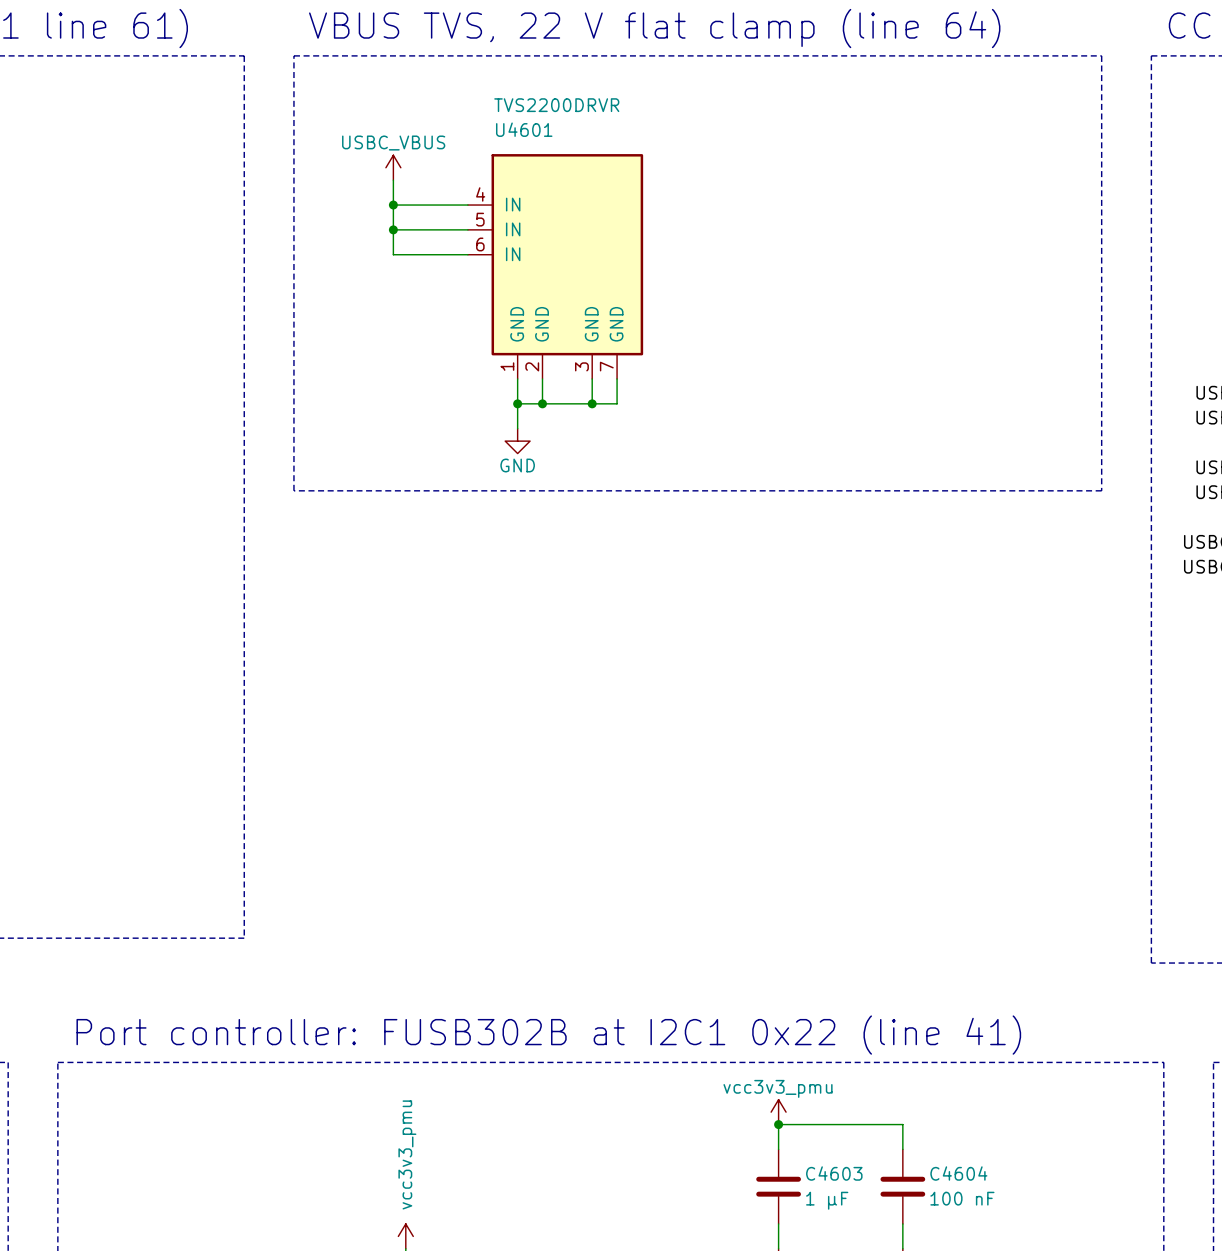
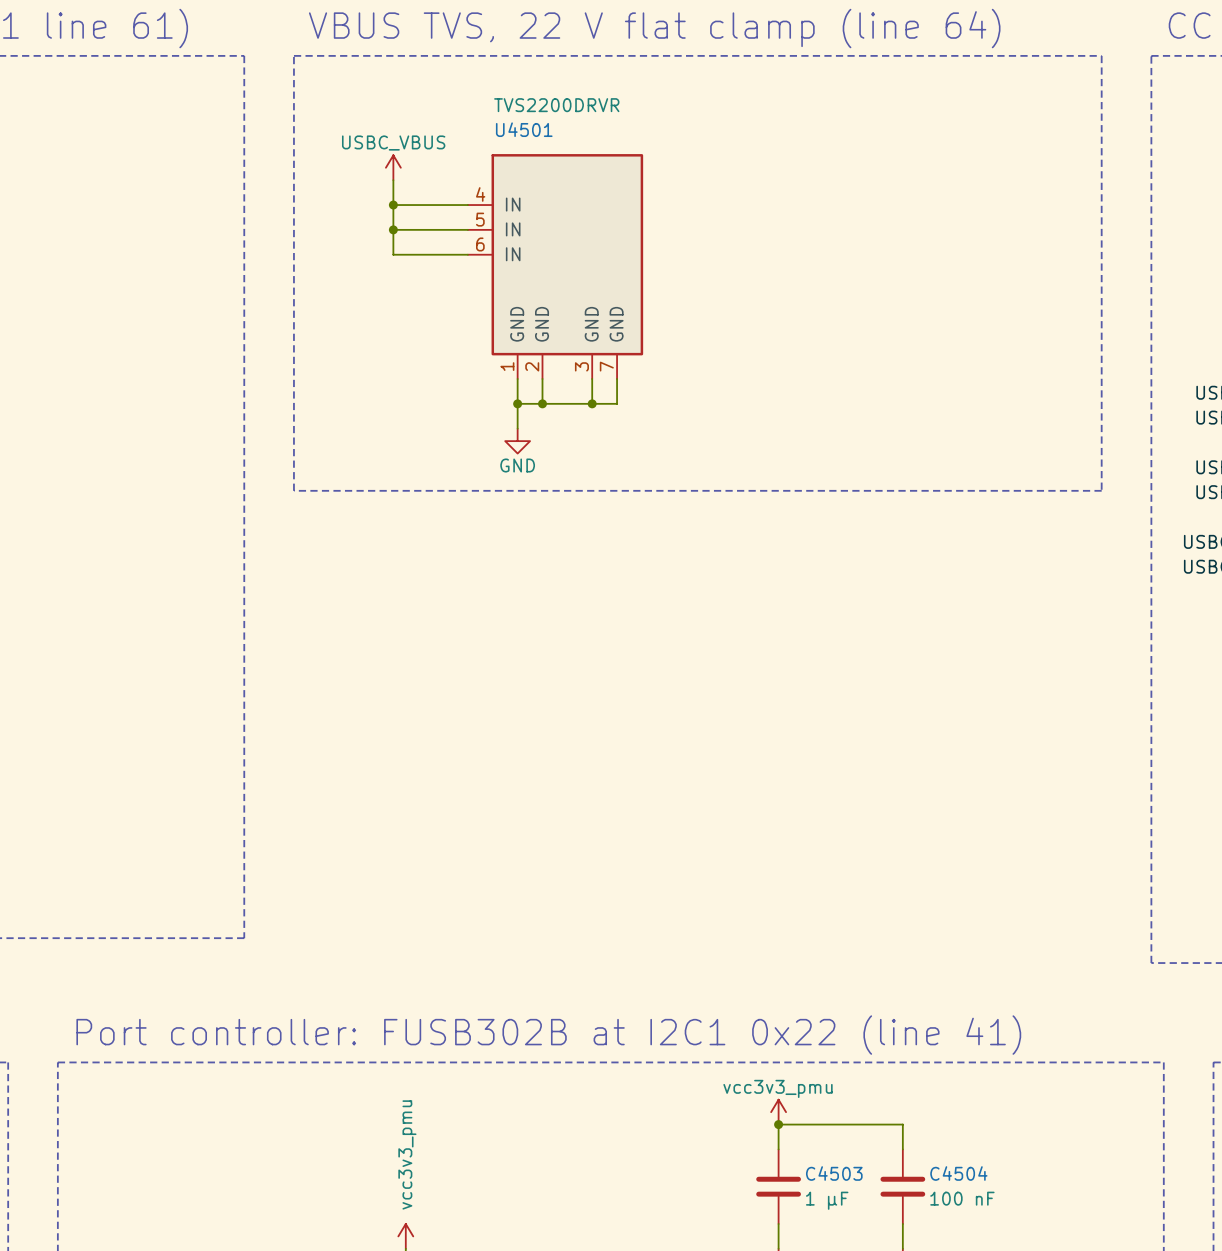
U4601 name: U4601 (524, 129) -> U4501 (524, 129)
C4603 name: C4603 (834, 1173) -> C4503 (834, 1173)
C4604 name: C4604 (958, 1173) -> C4504 (958, 1173)

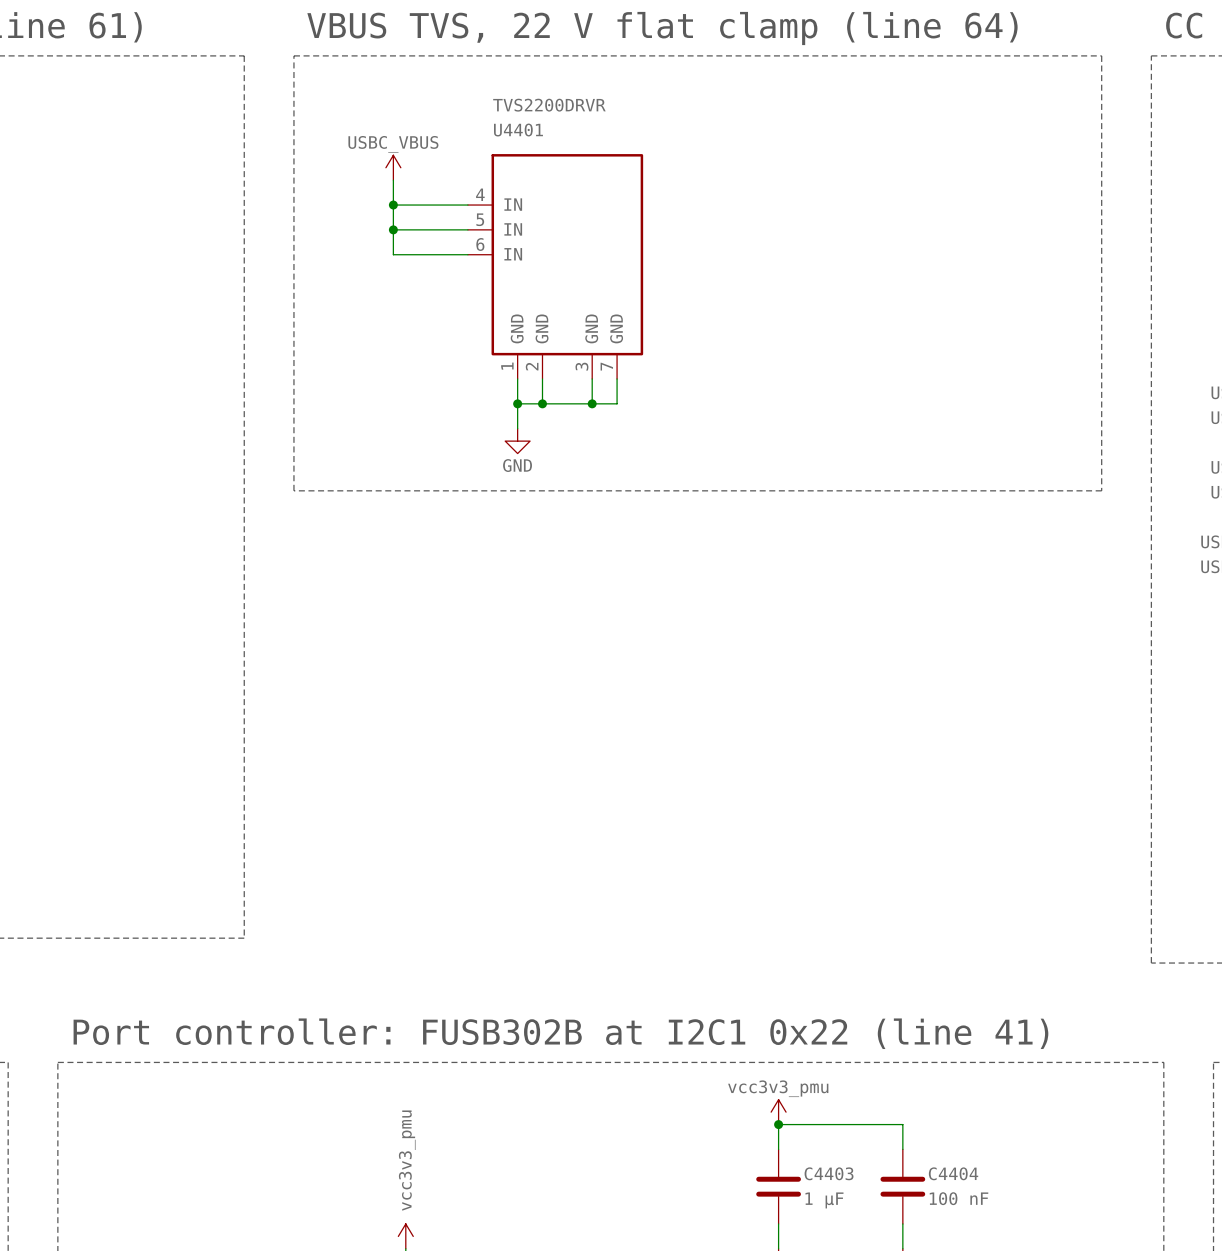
U4501 name: U4501 (524, 129) -> U4401 (518, 130)
C4503 name: C4503 (834, 1173) -> C4403 (829, 1173)
C4504 name: C4504 (958, 1173) -> C4404 (953, 1173)

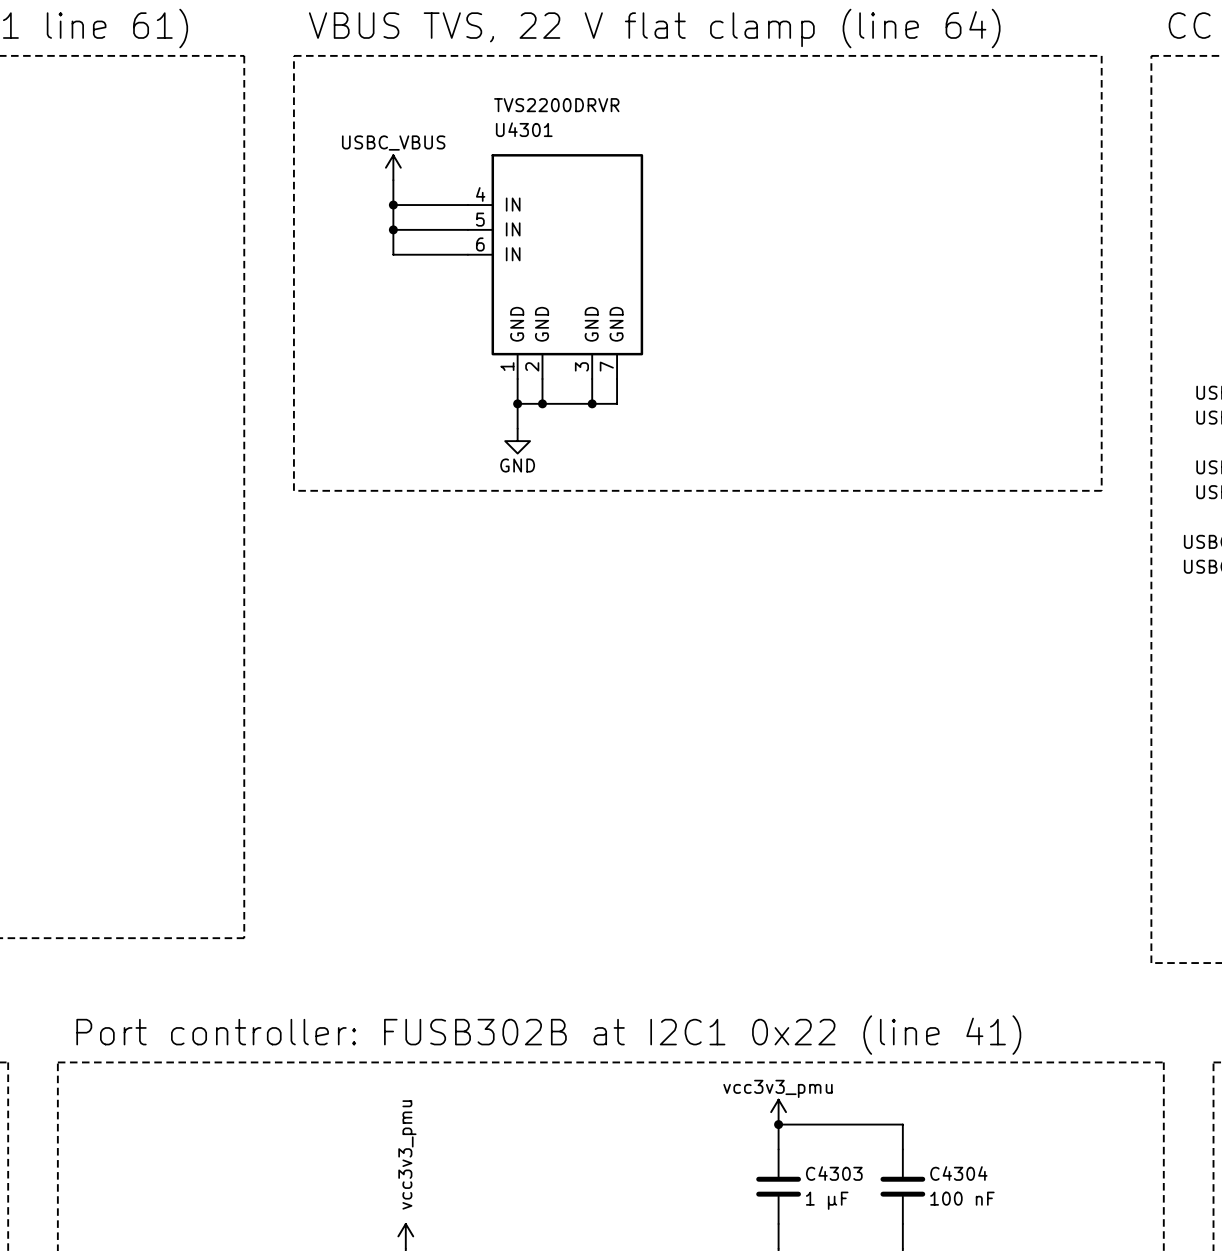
U4401 name: U4401 (518, 130) -> U4301 (524, 129)
C4403 name: C4403 (829, 1173) -> C4303 (834, 1173)
C4404 name: C4404 (953, 1173) -> C4304 (958, 1173)

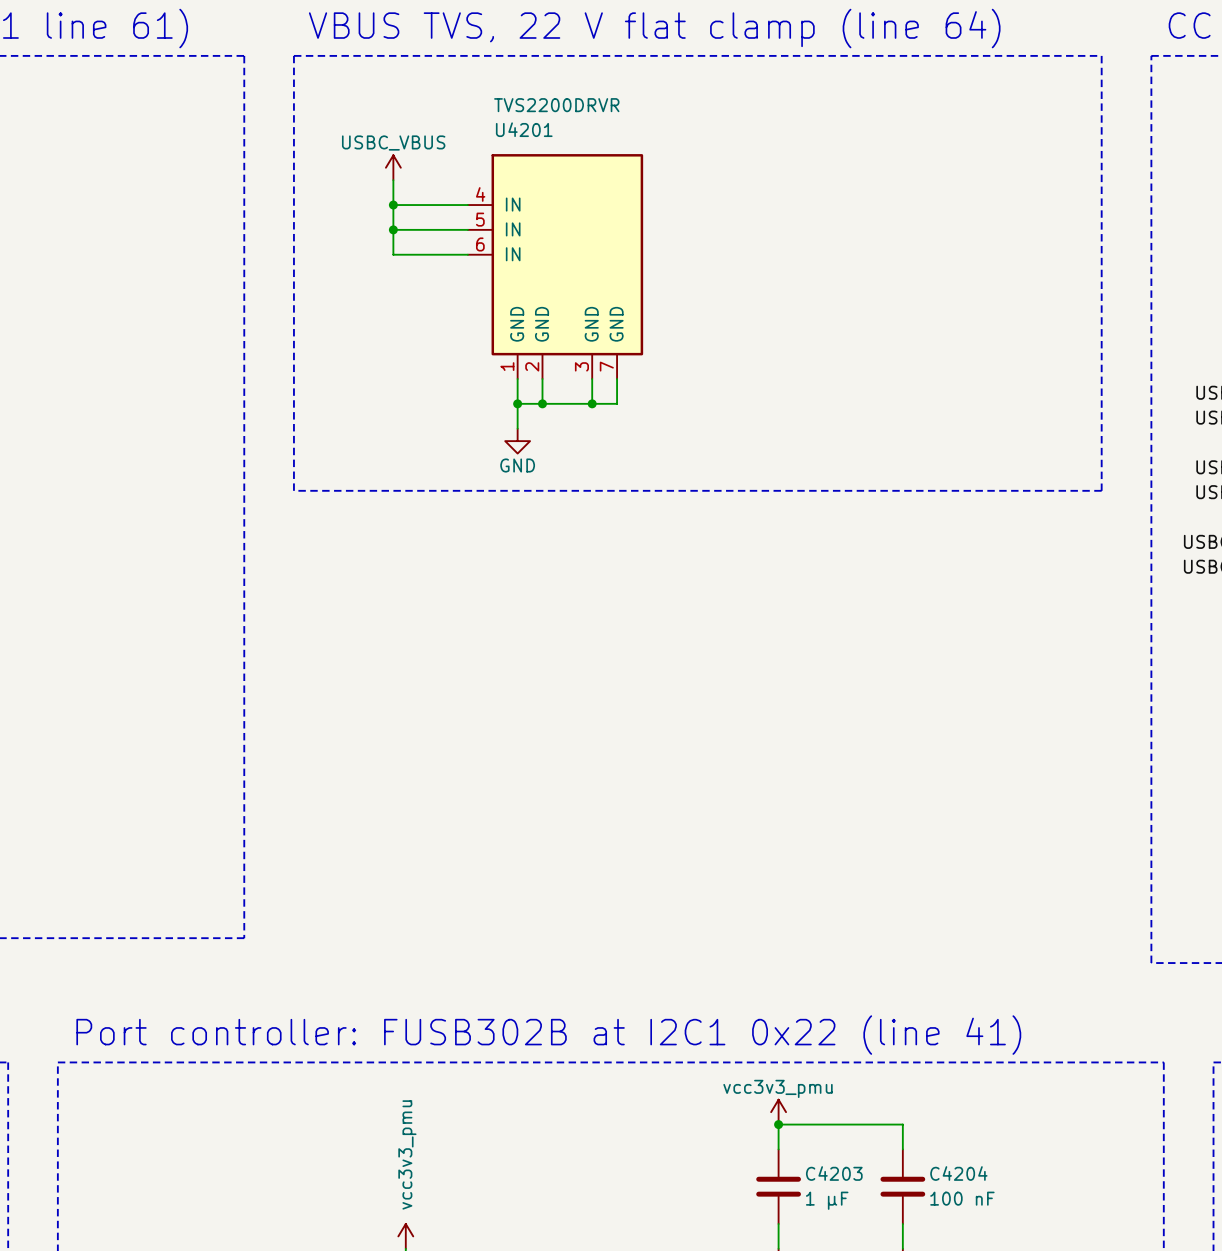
U4301 name: U4301 (524, 129) -> U4201 (524, 129)
C4303 name: C4303 (834, 1173) -> C4203 (834, 1173)
C4304 name: C4304 (958, 1173) -> C4204 (958, 1173)

